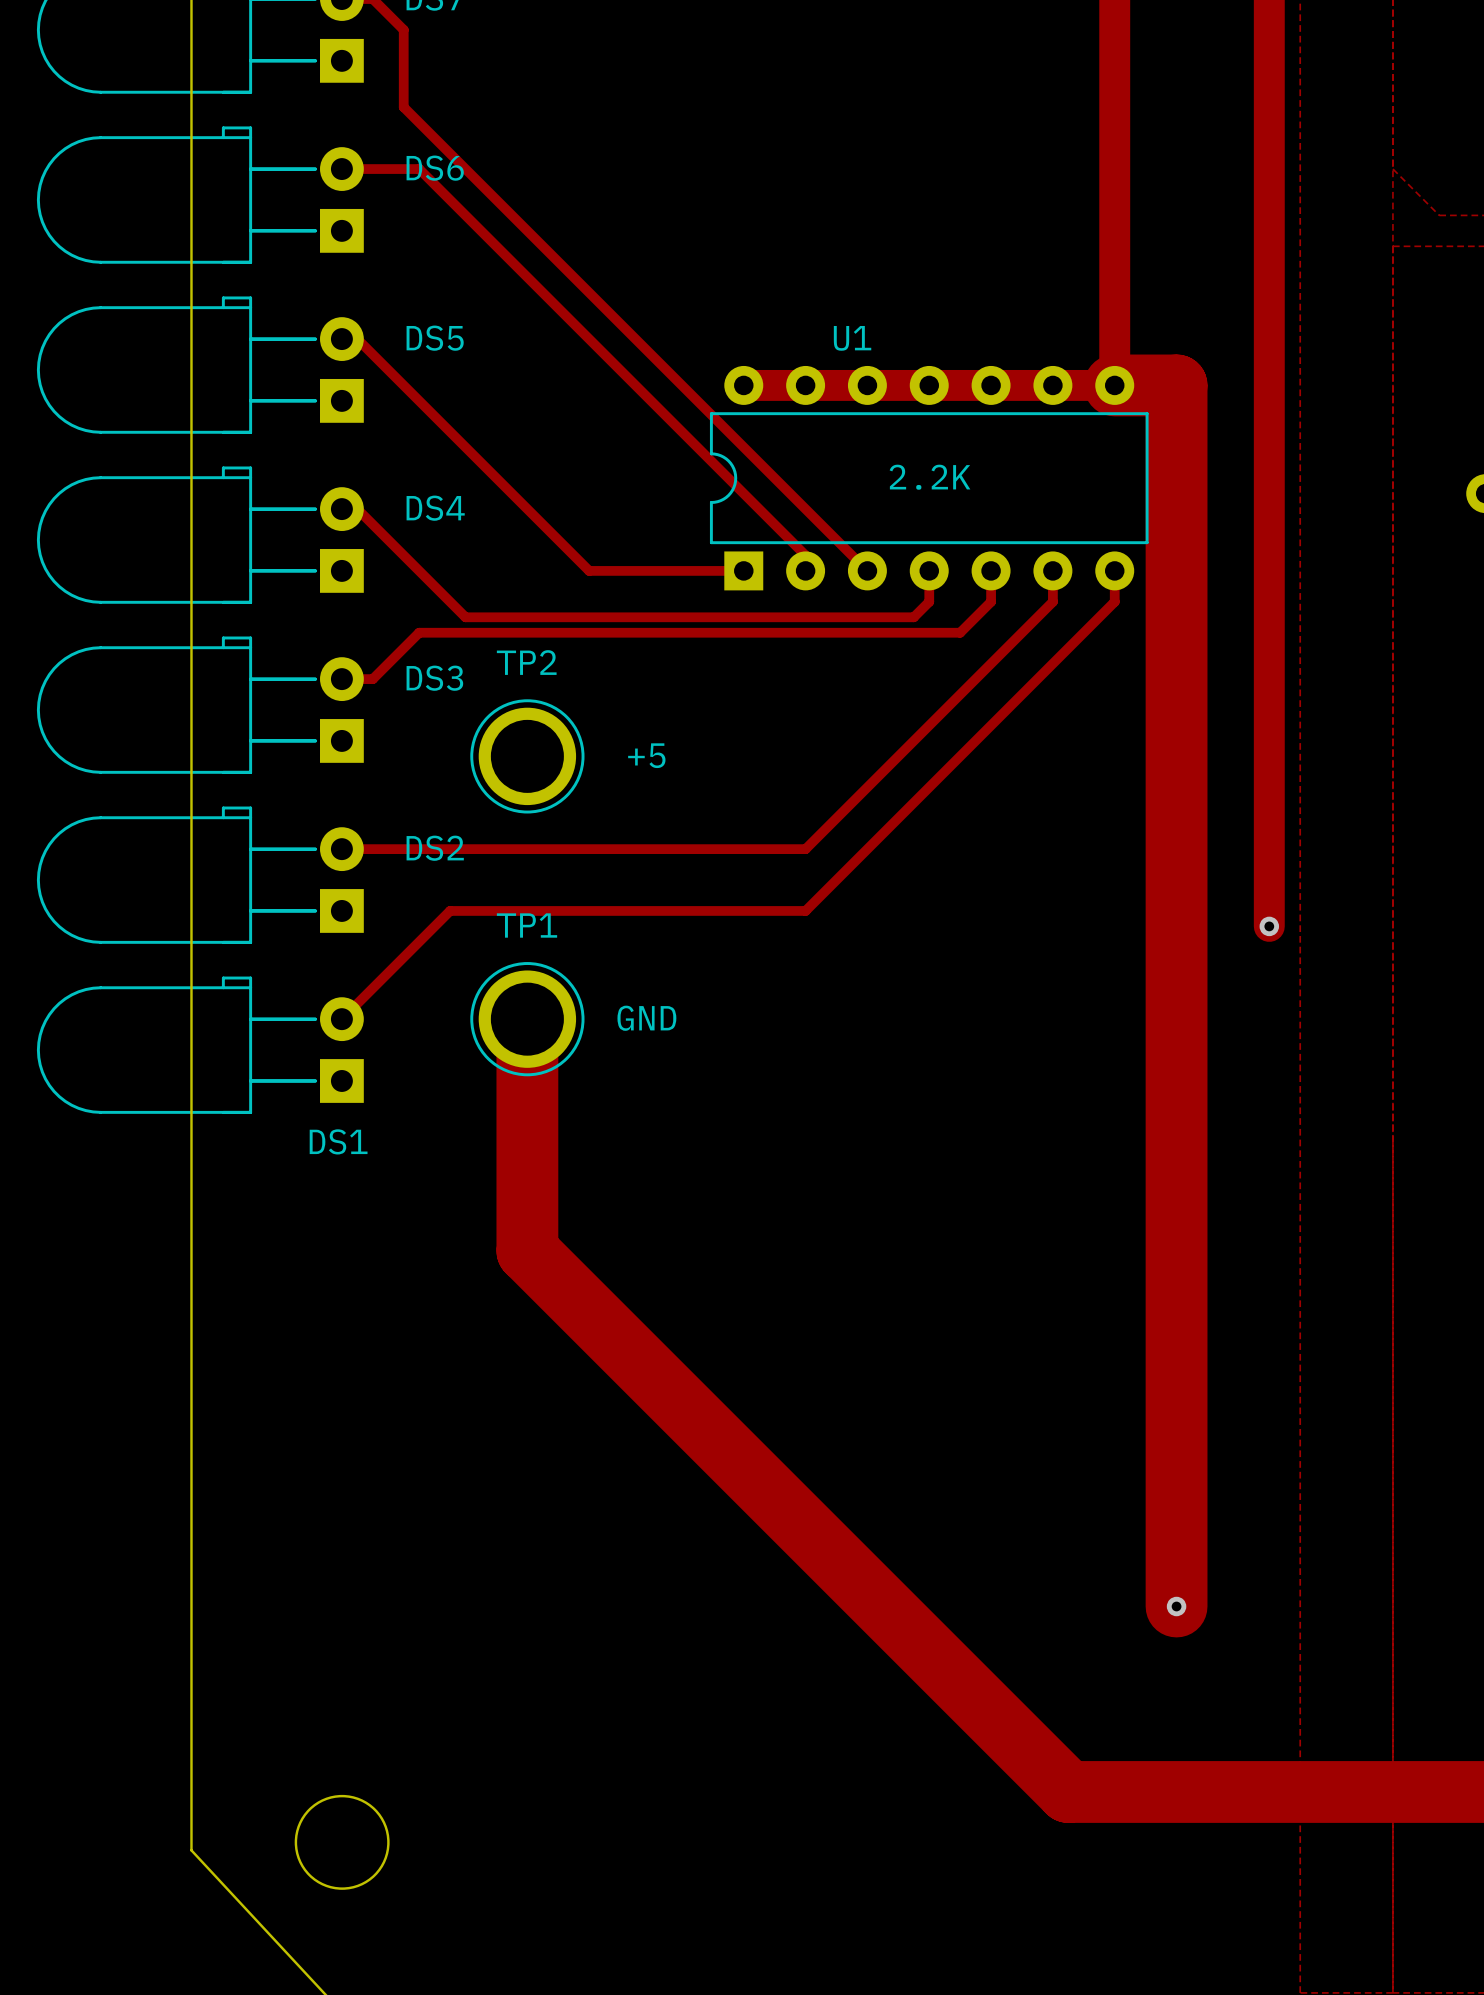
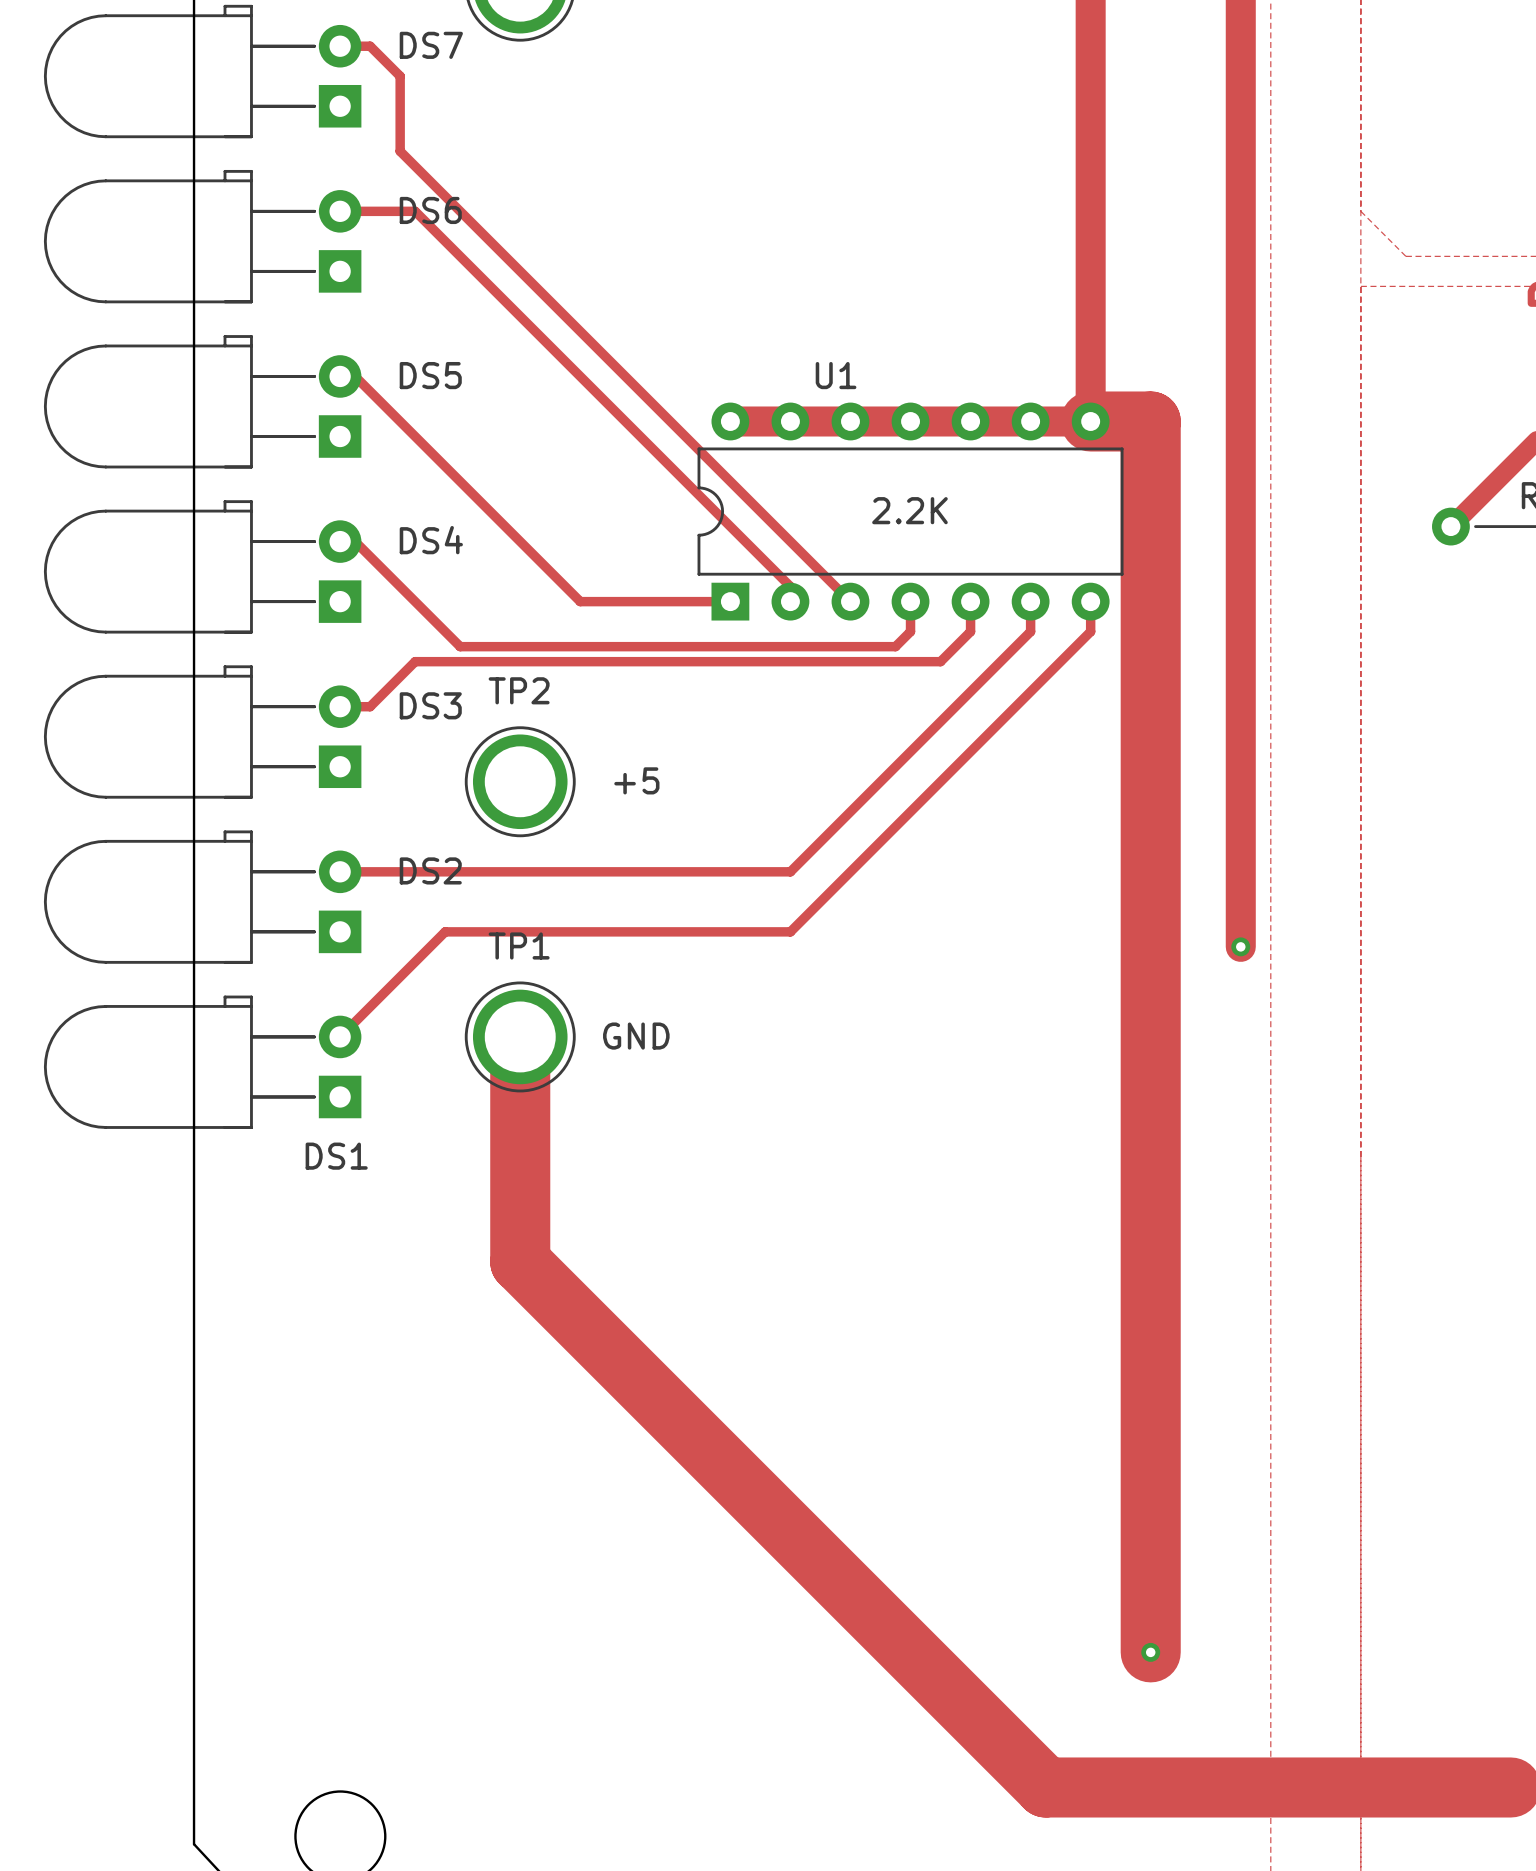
track: none -> (1150, 1607) (1150, 1652)
via position: (1176, 1606) -> (1150, 1652)

